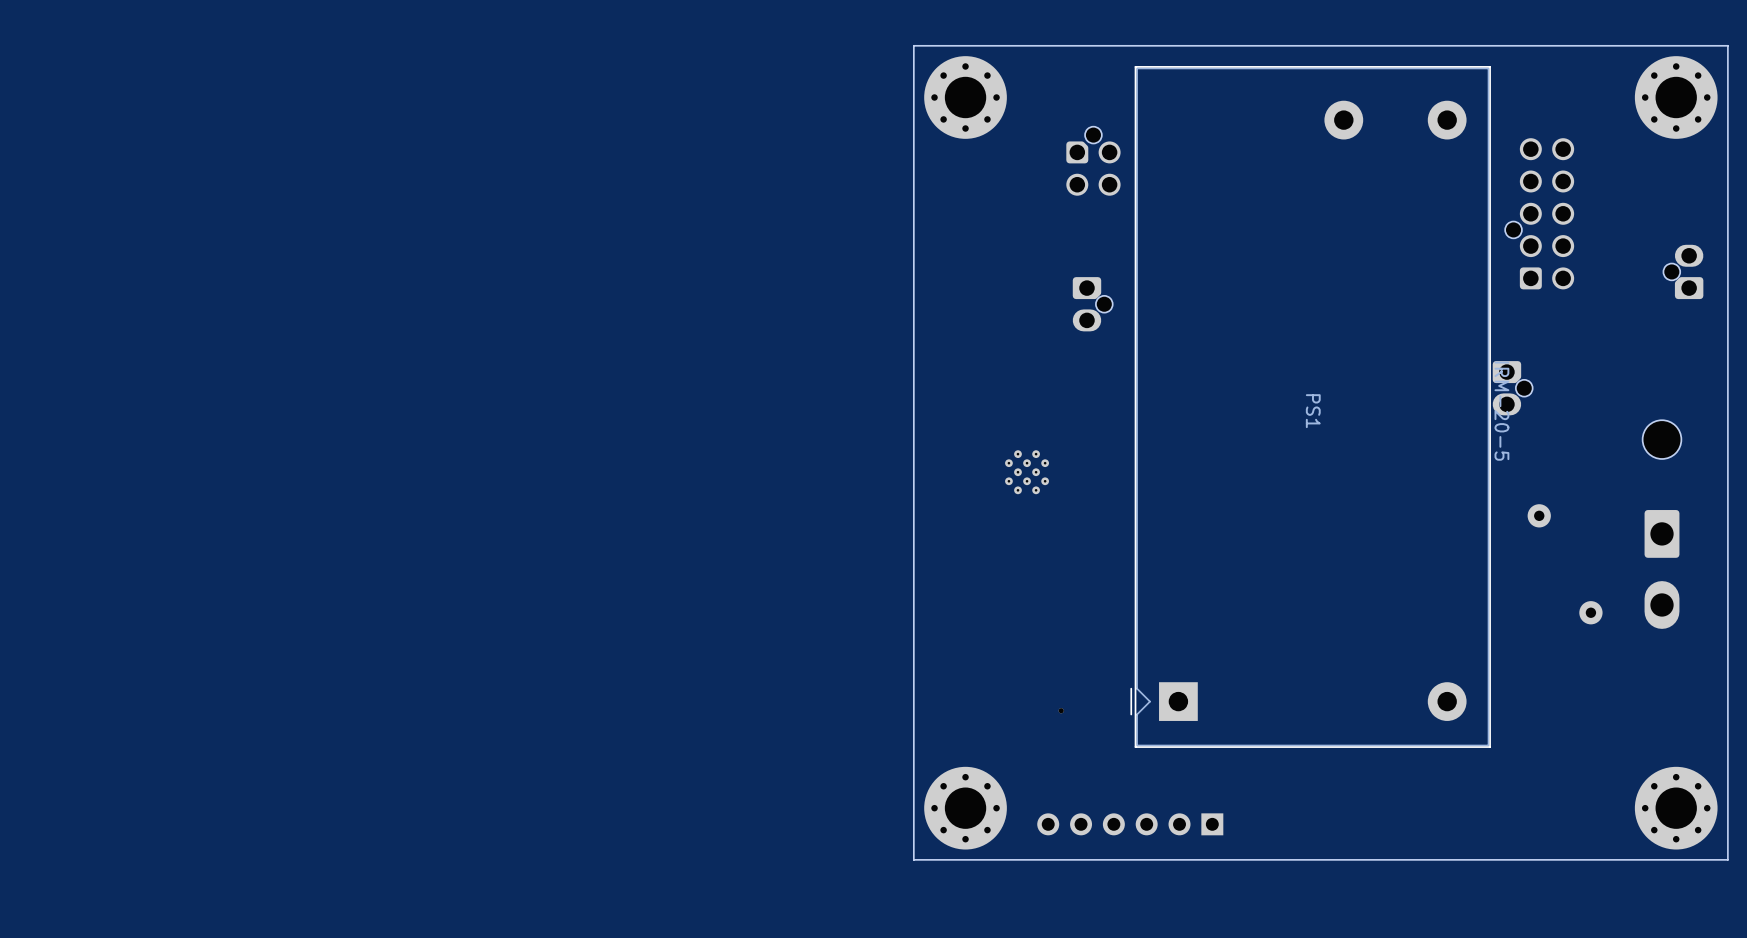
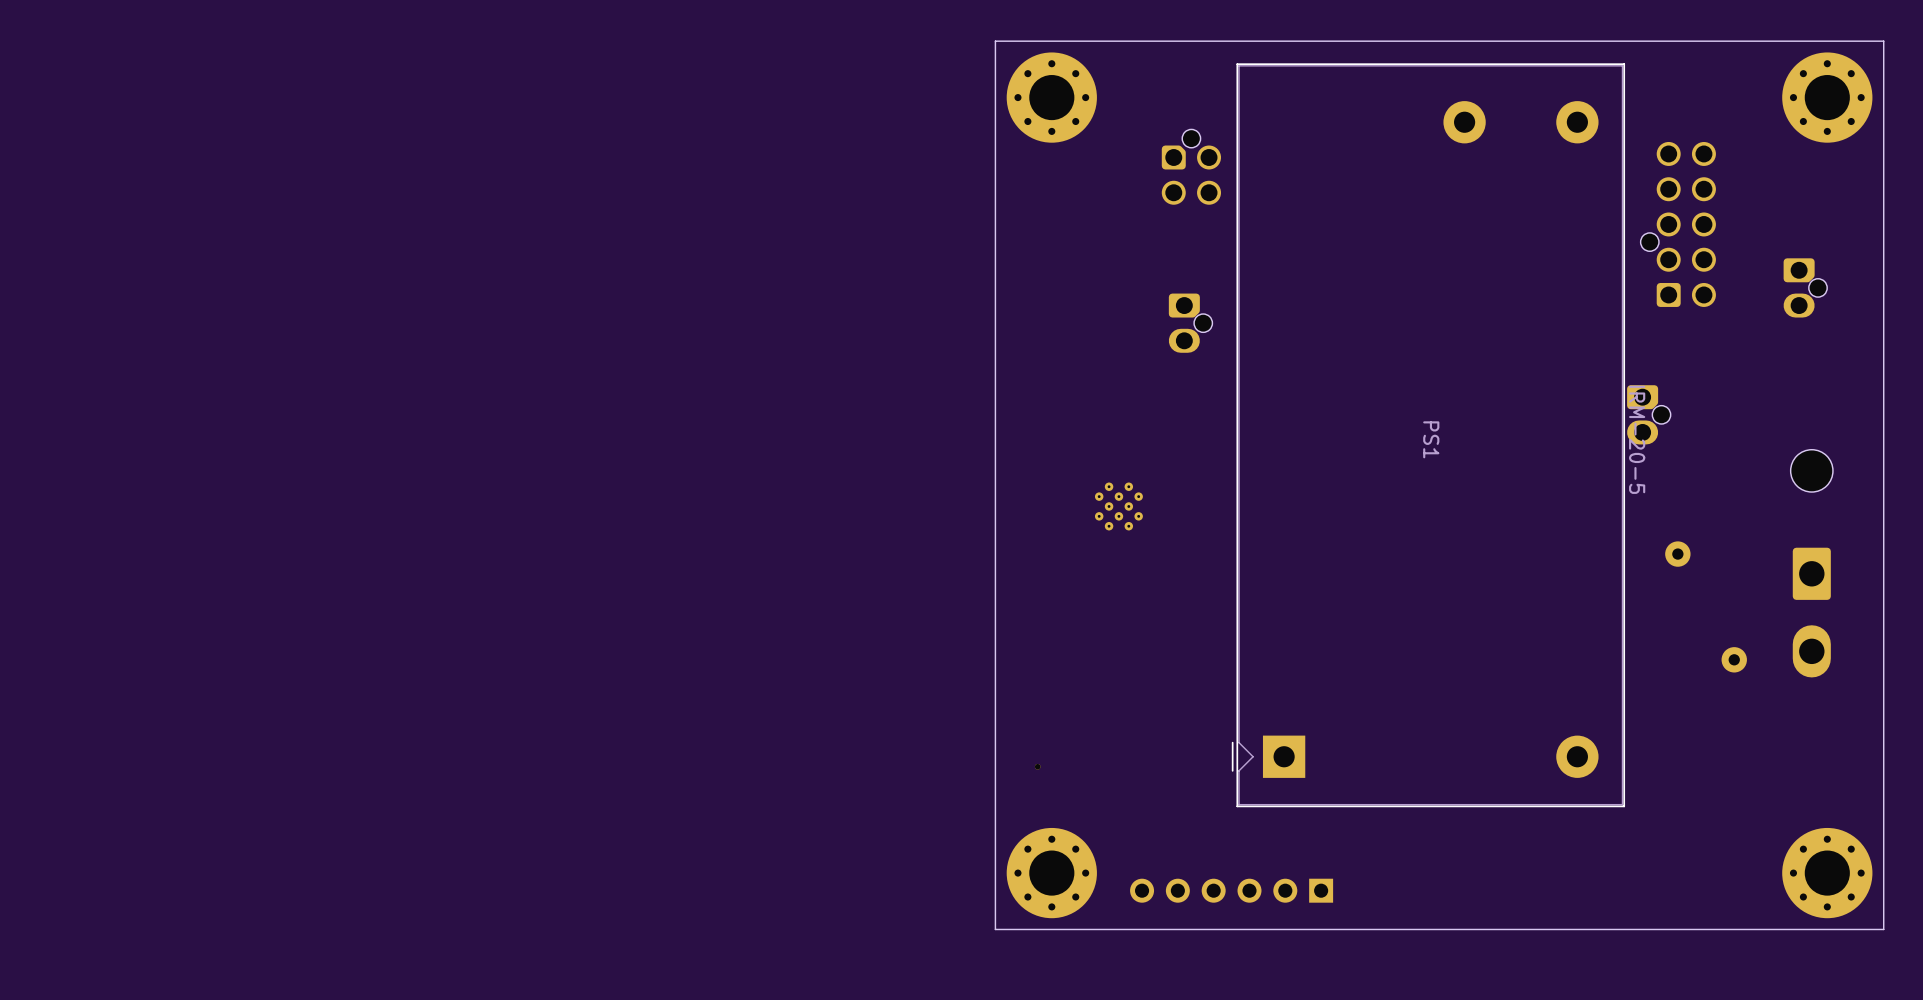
part rotation: 0° (1683, 271) -> 180° (1805, 287)
part position: (1061, 710) -> (1037, 766)

